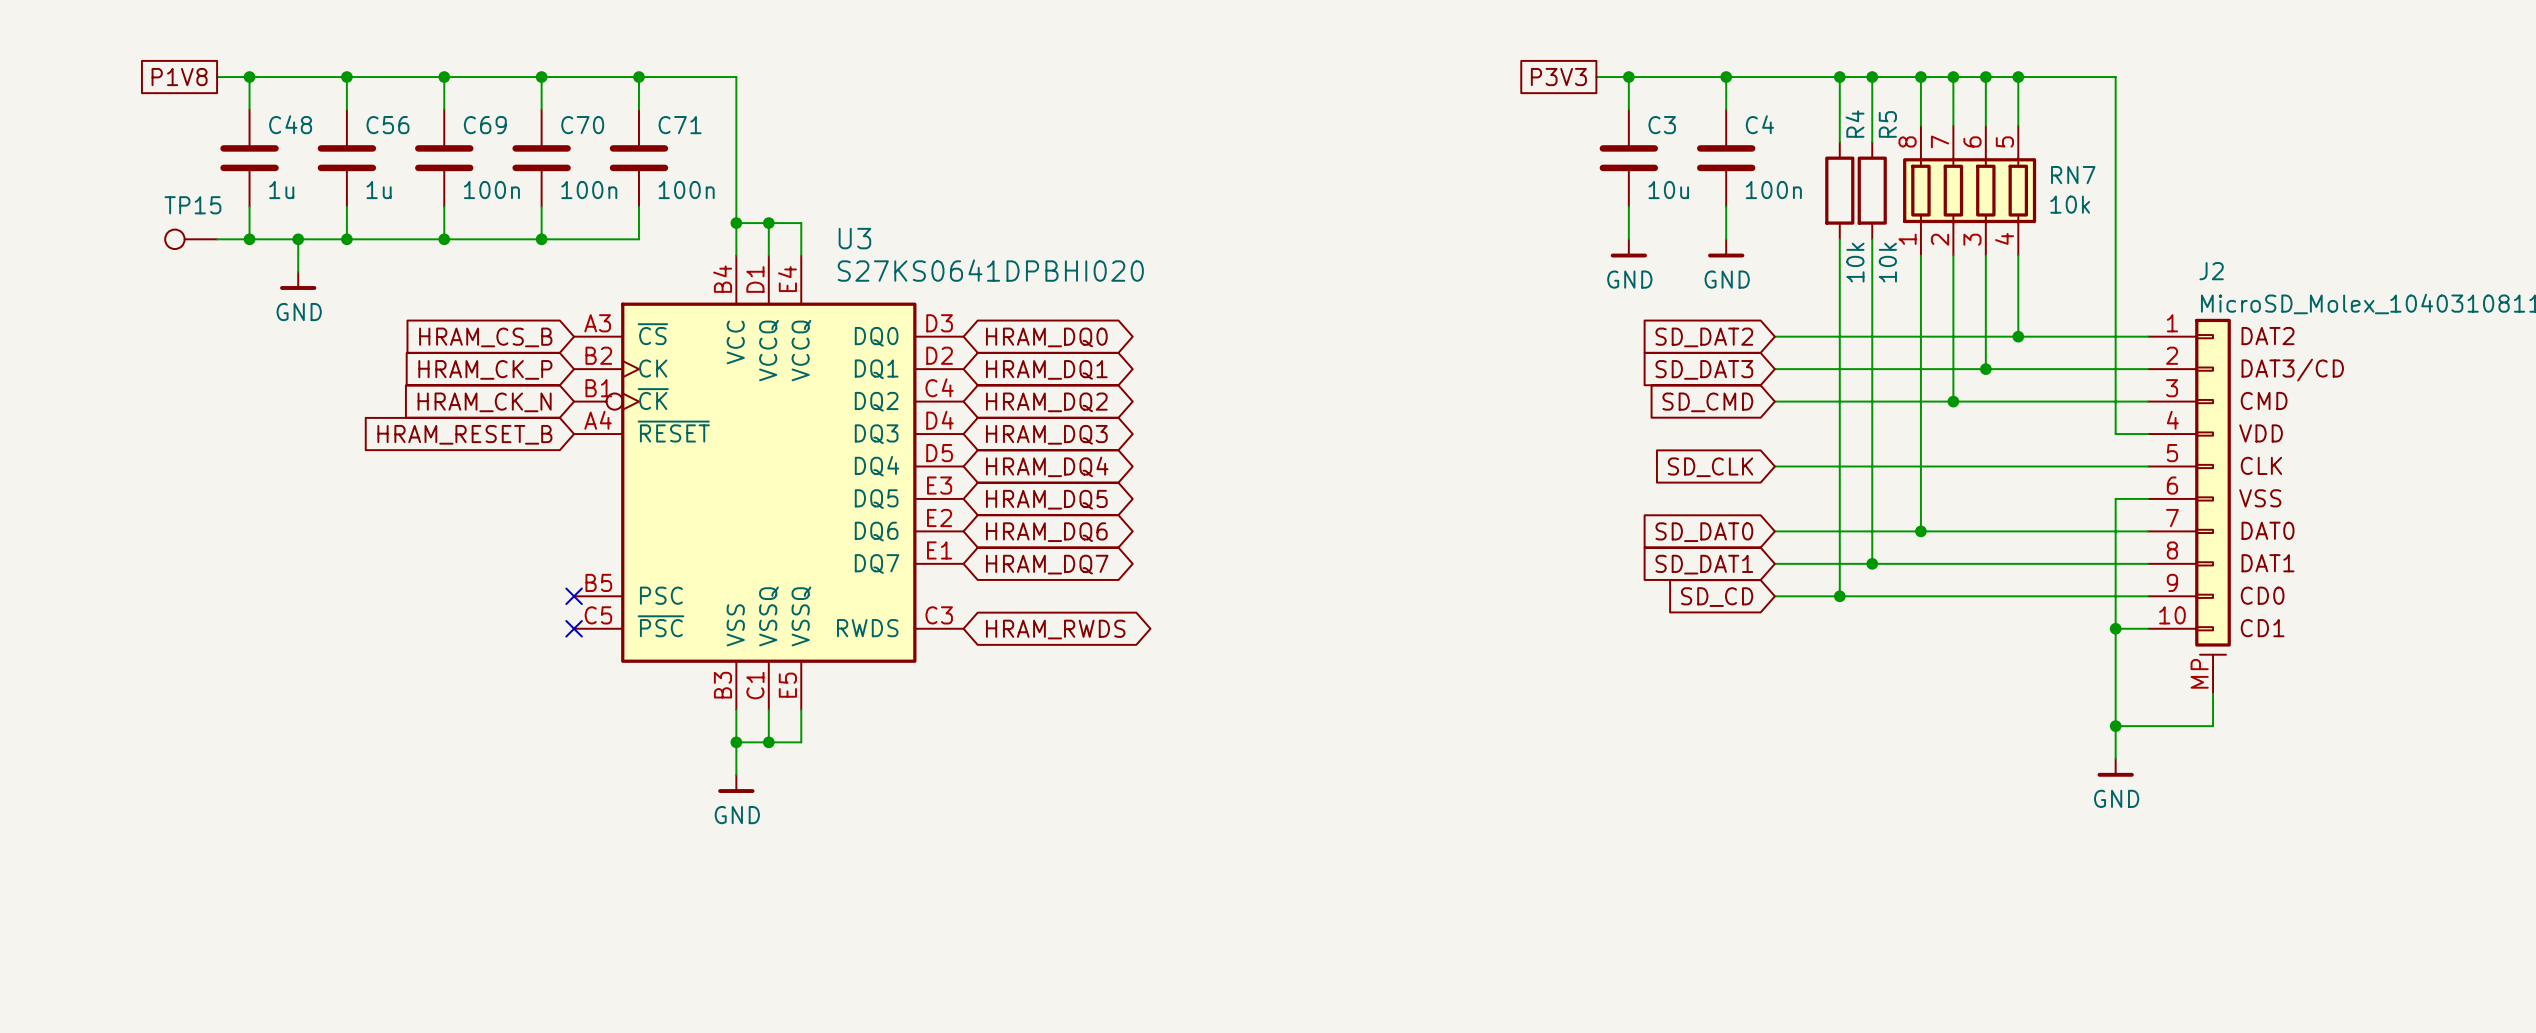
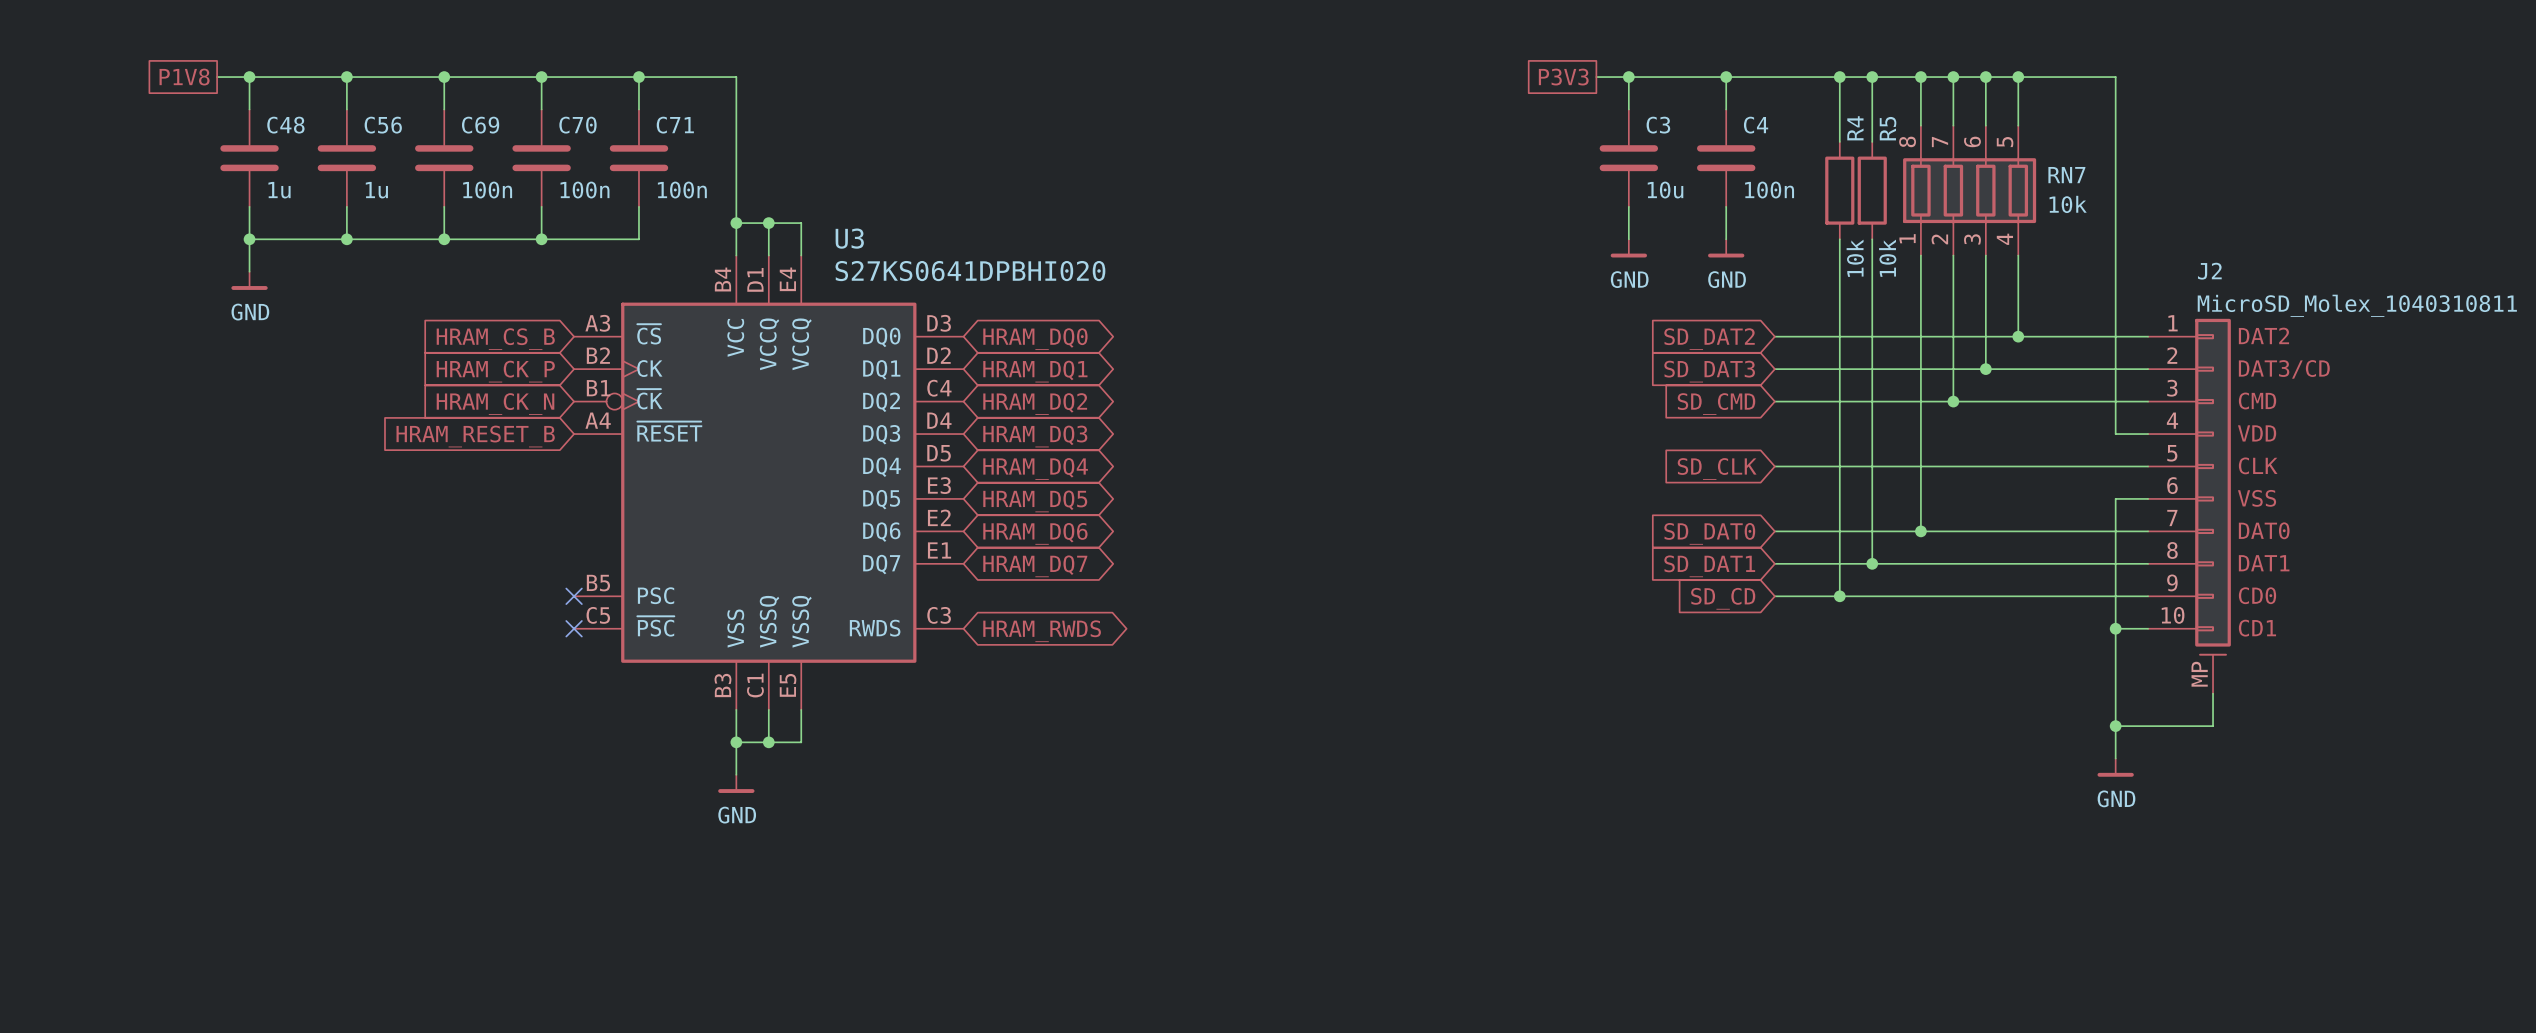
TP15: (191, 239) -> none
wire: (217, 239) (249, 239) -> (249, 271) (249, 239)
wire: (298, 239) (298, 271) -> none
junction: (298, 239) -> none
power symbol position: GND (298, 280) -> GND (249, 280)

